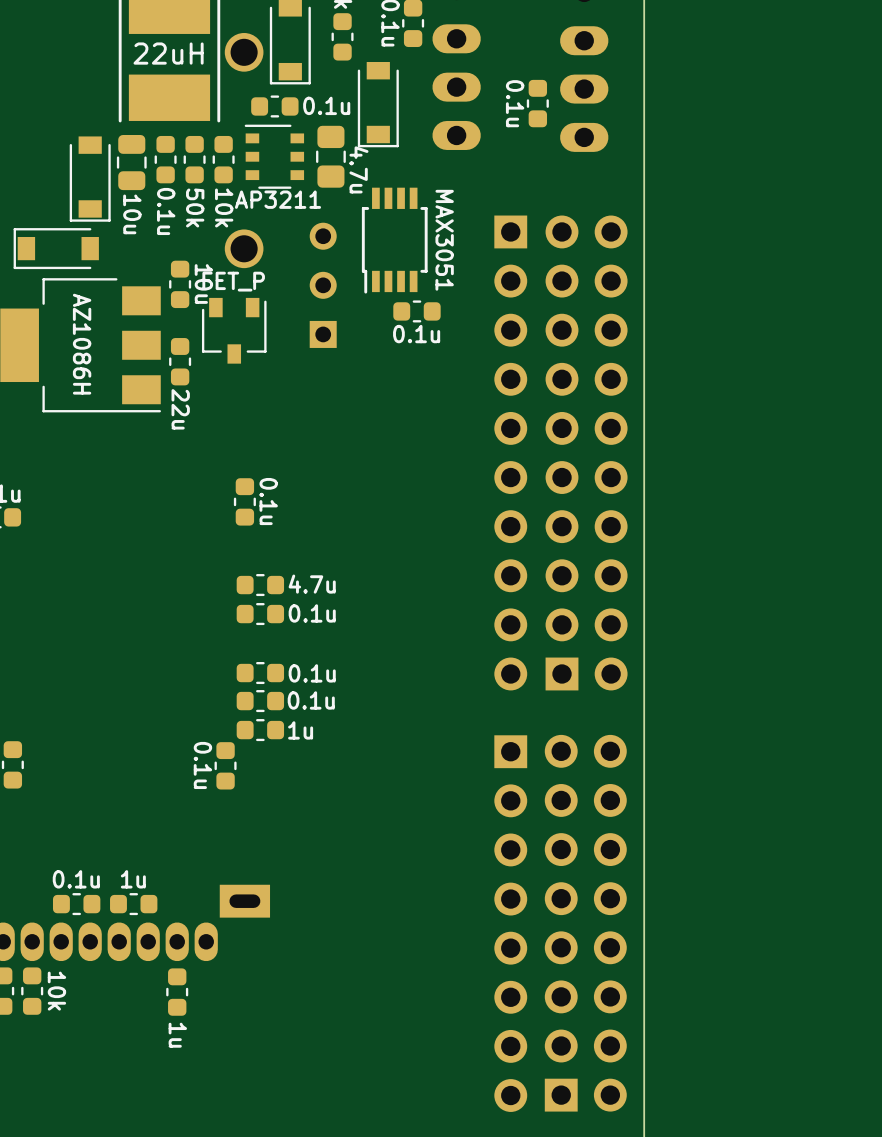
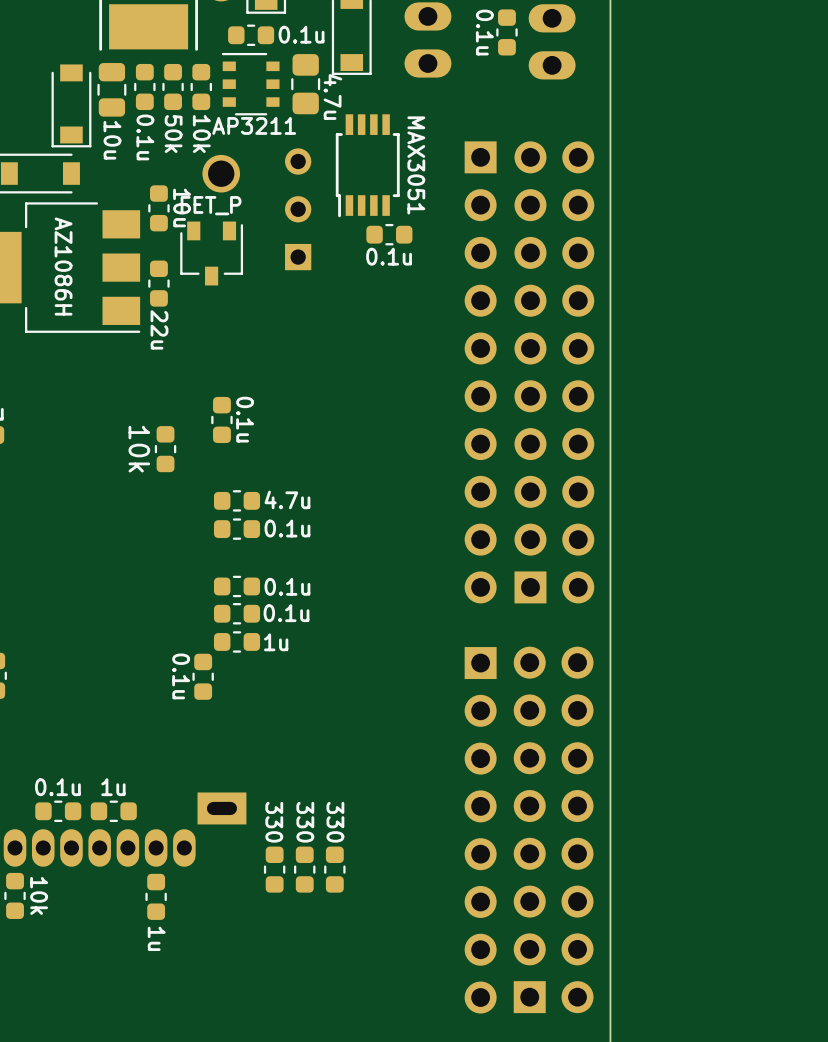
part: none -> 10k (165, 449)
part: none -> 330 (274, 869)
part: none -> 330 (304, 869)
part: none -> 330 (334, 869)

